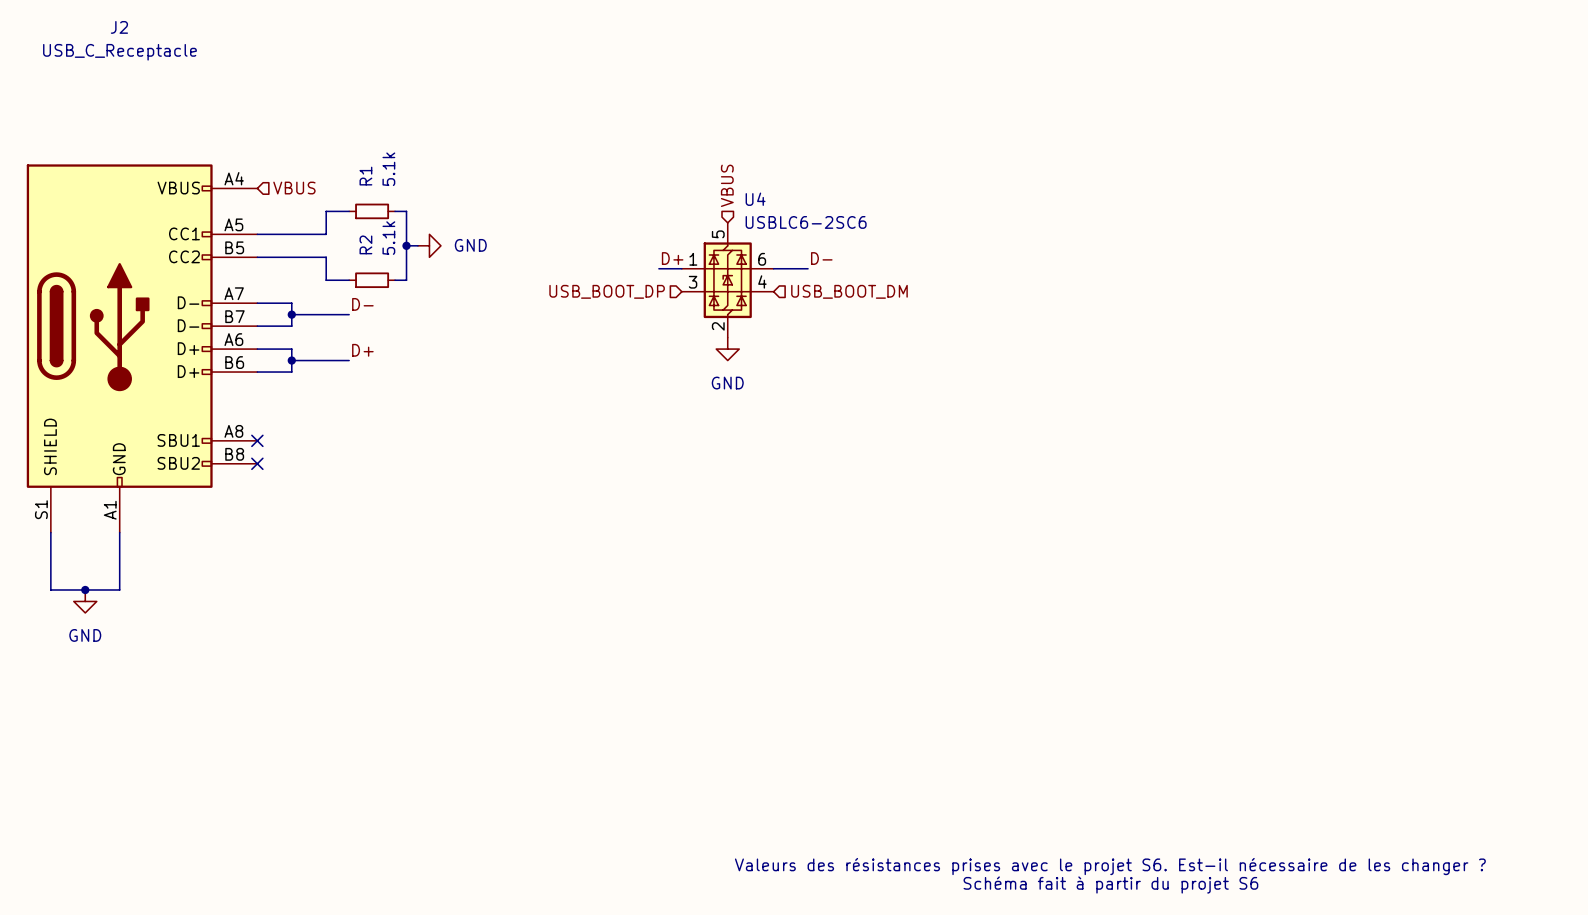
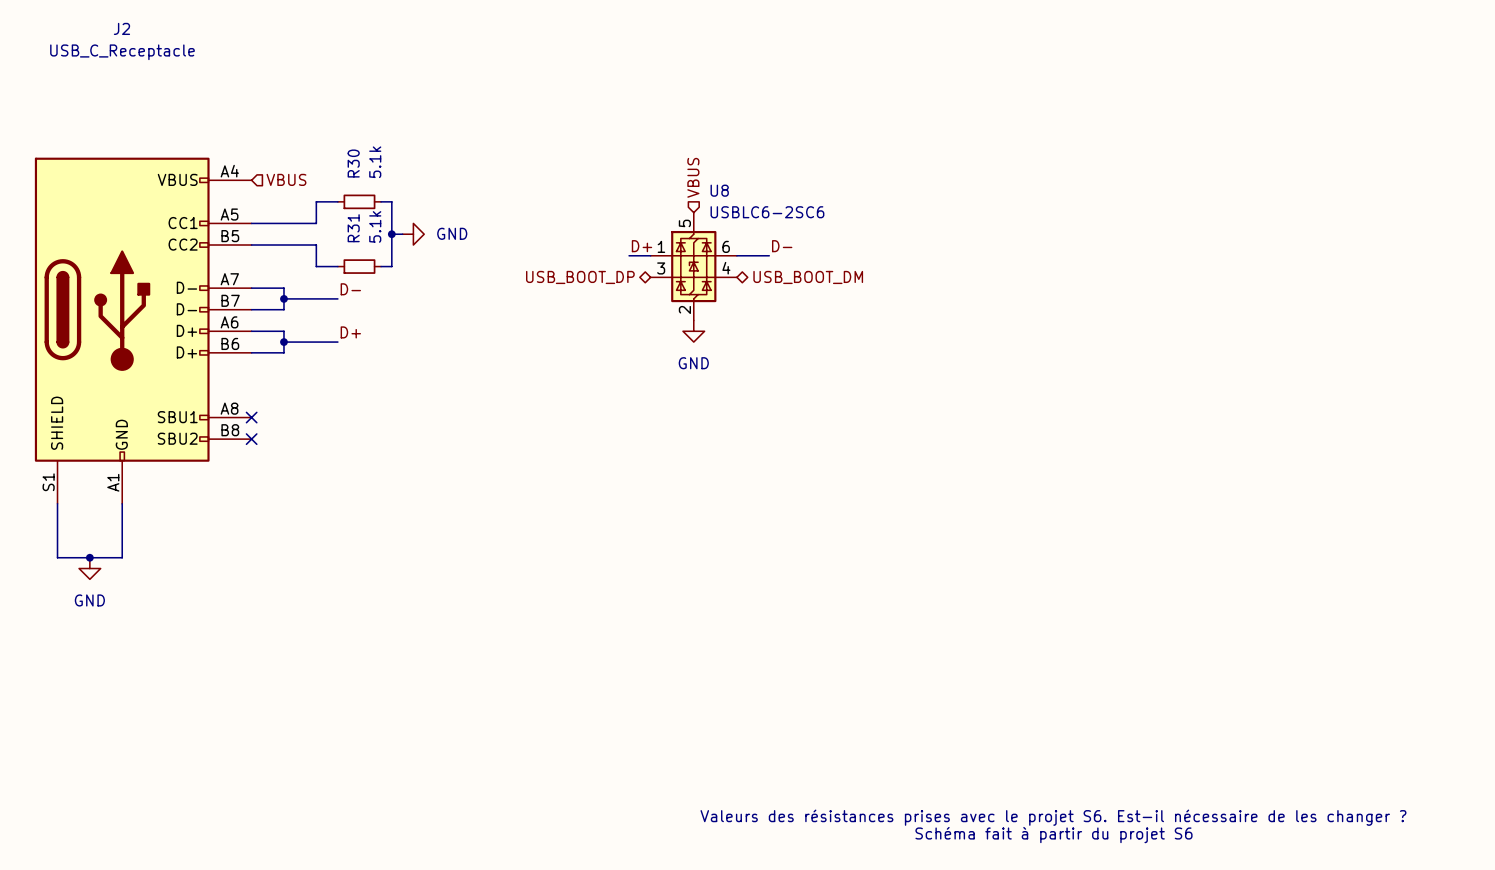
R1 name: R1 (365, 176) -> R30 (353, 163)
U4 name: U4 (755, 199) -> U8 (719, 190)
R2 name: R2 (365, 244) -> R31 (353, 228)
hierarchical label shape: input (607, 291) -> bidirectional (580, 277)
hierarchical label shape: input (849, 291) -> bidirectional (808, 277)

